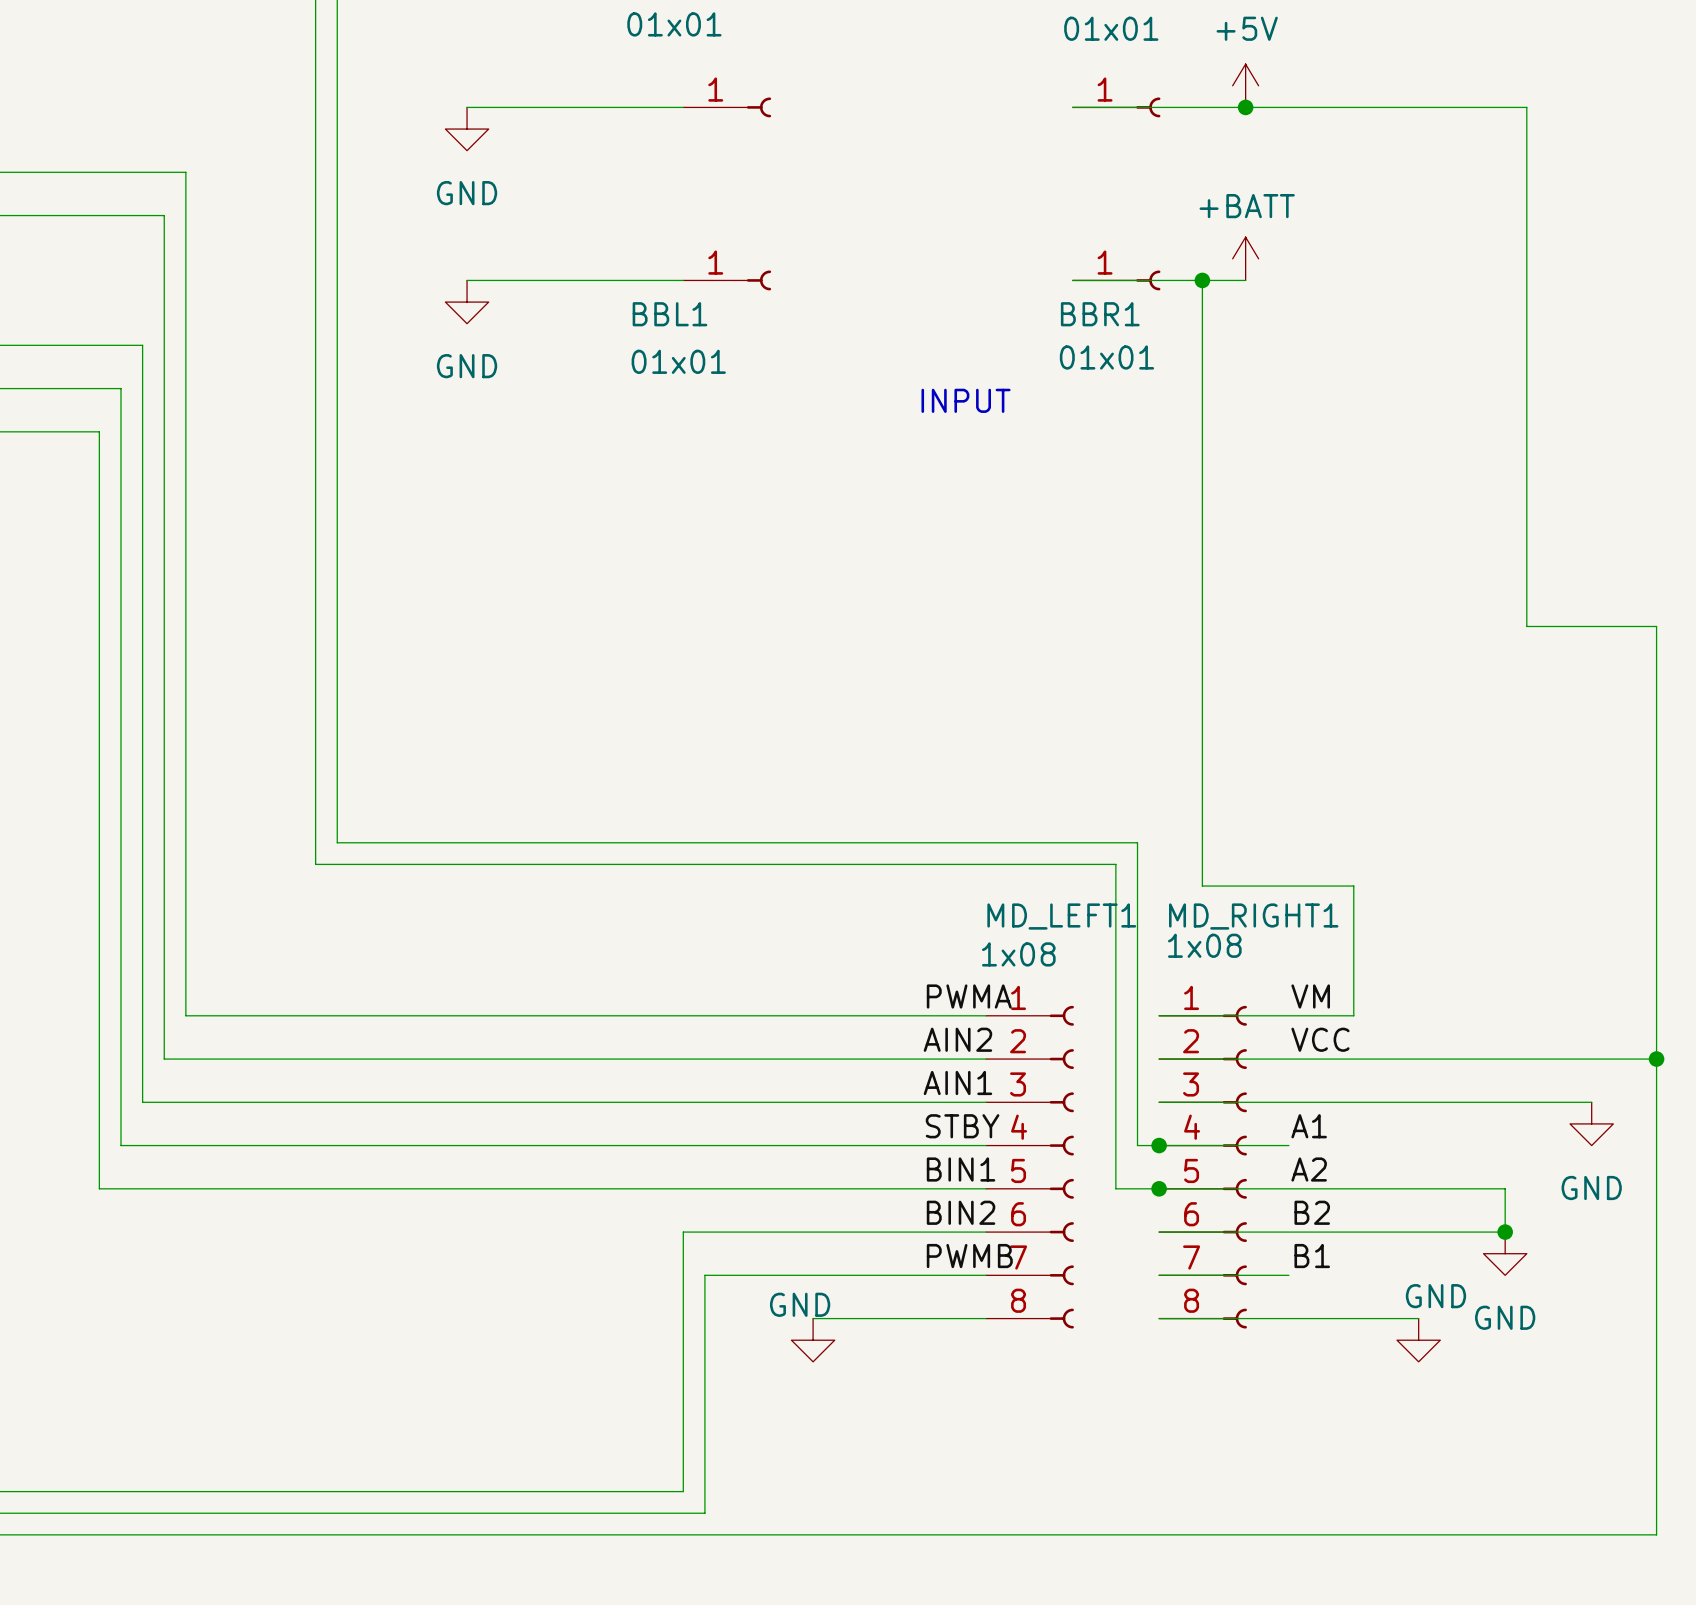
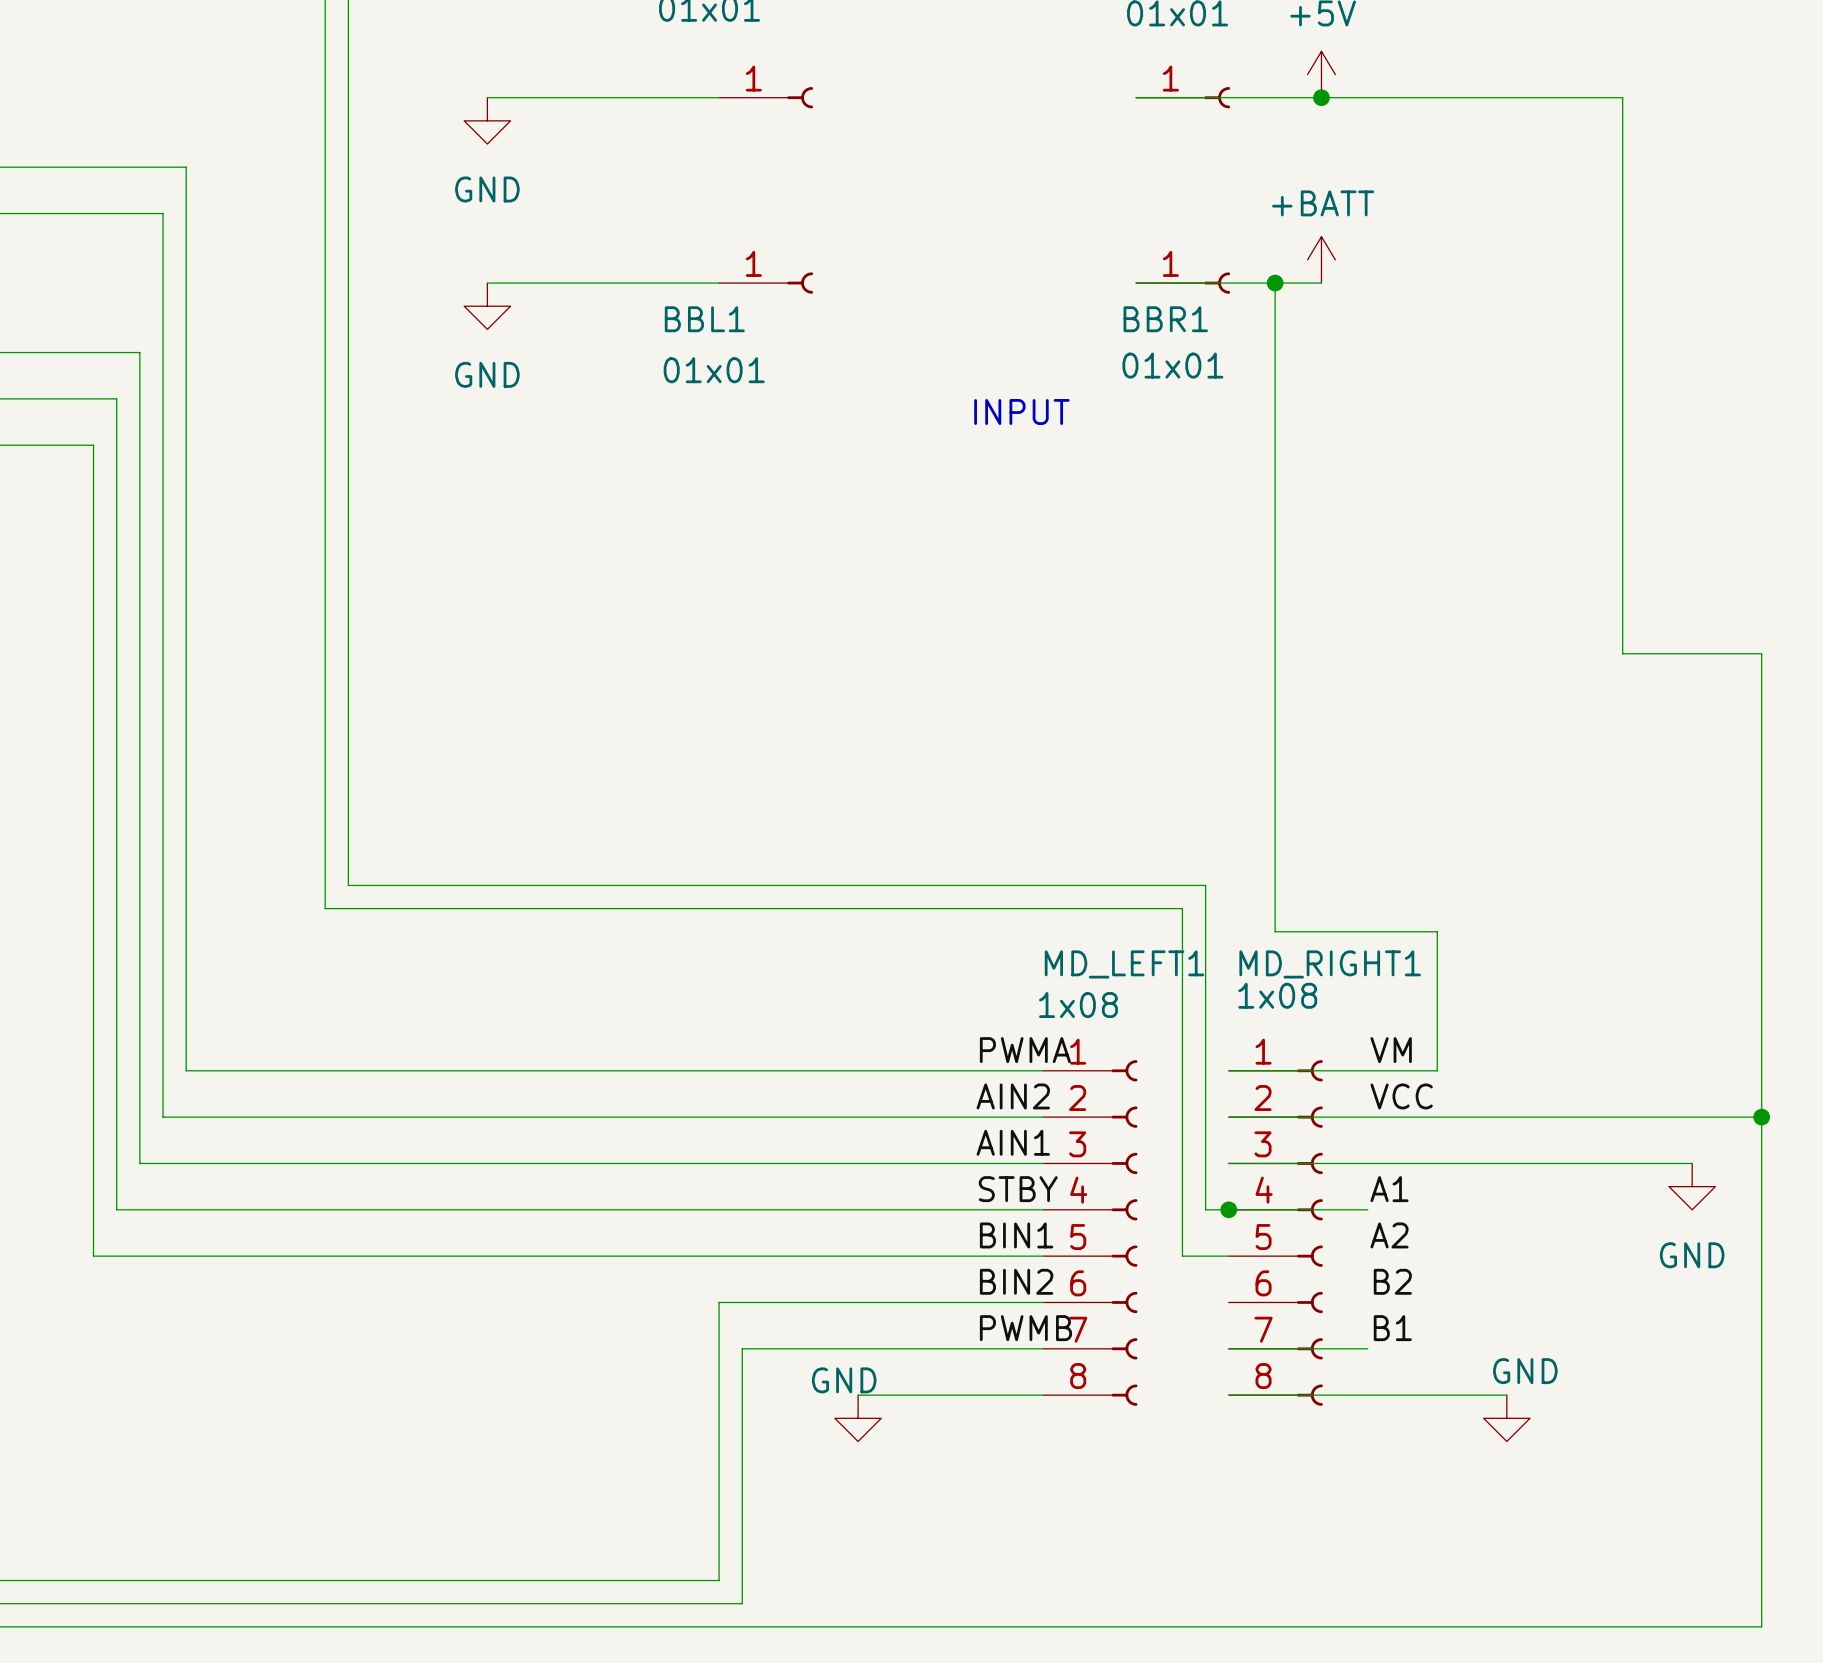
wire: (1159, 1188) (1505, 1188) (1505, 1232) (1159, 1232) -> none
junction: (1159, 1188) -> none
junction: (1505, 1232) -> none
power symbol: GND (1505, 1253) -> none

